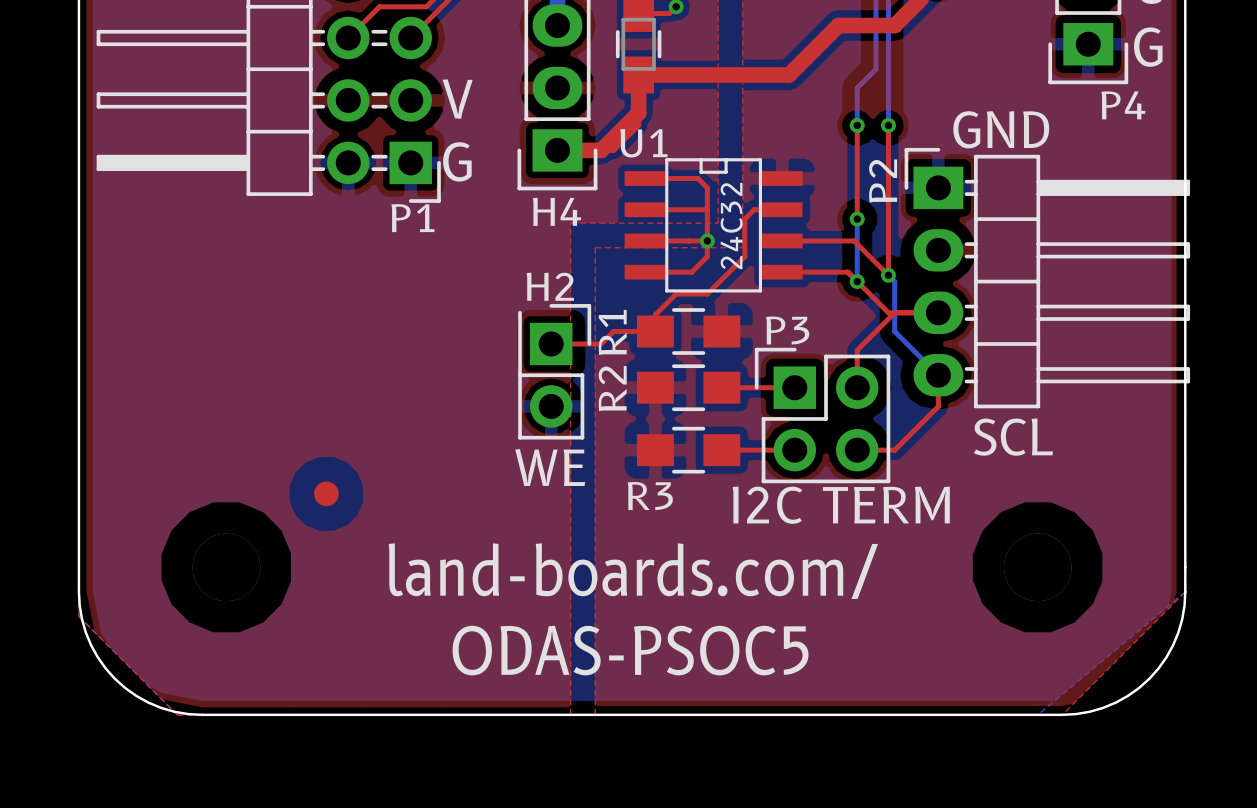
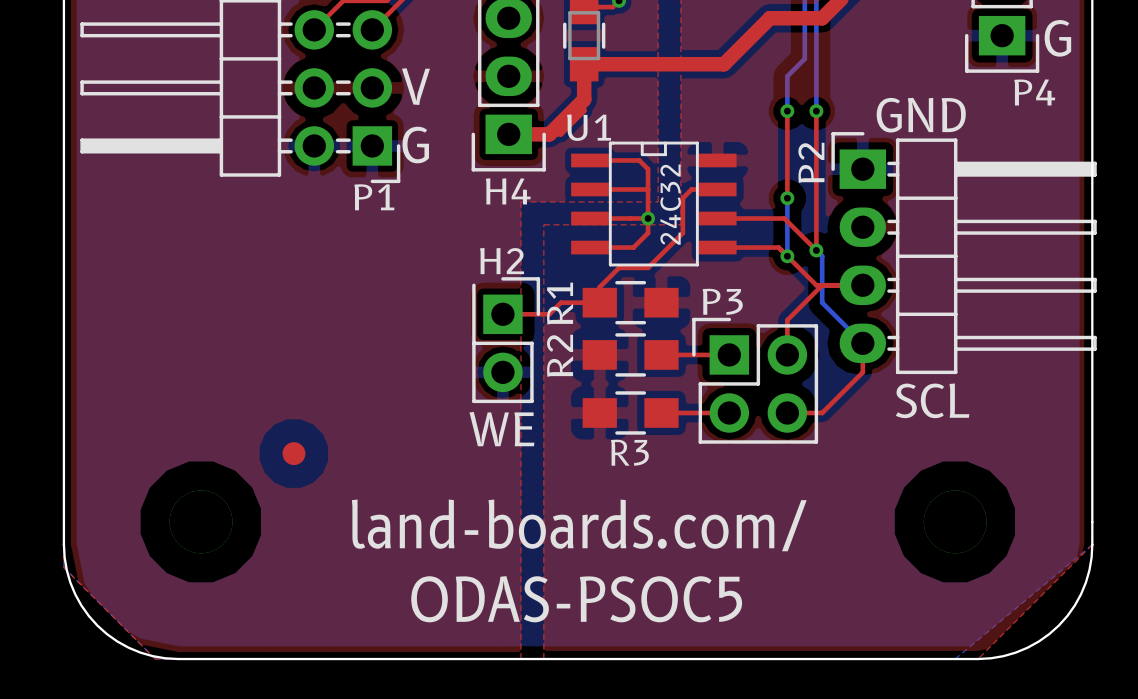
R3 name position: R3 (650, 496) -> R3 (629, 452)
text: I2C TERM (841, 505) -> none

